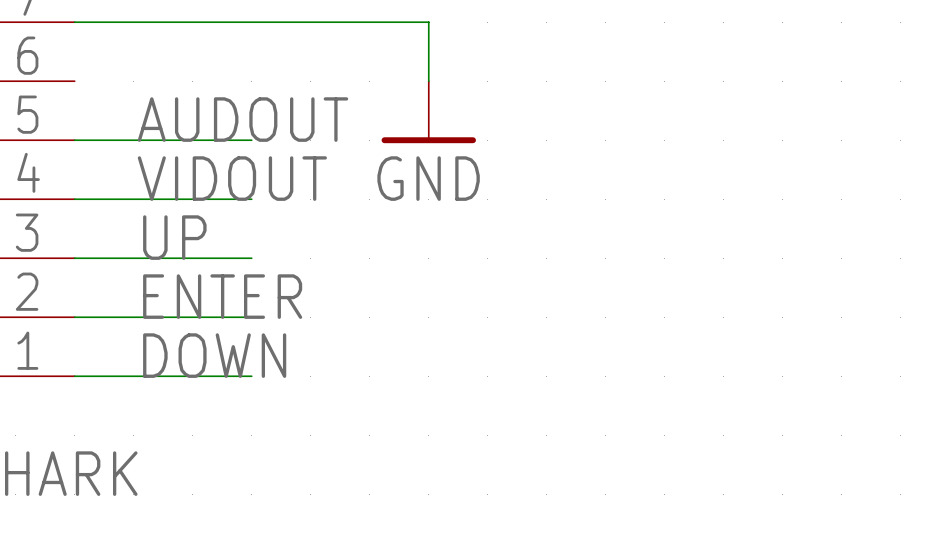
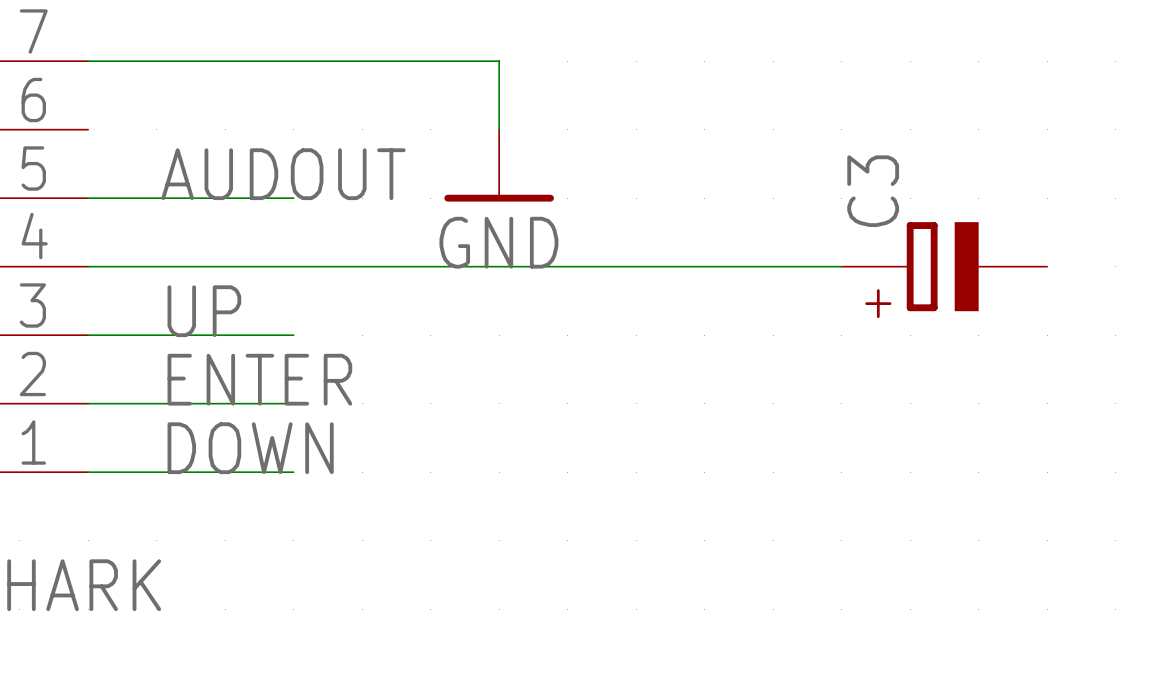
label: VIDOUT (232, 178) -> none
wire: none -> (293, 266) (841, 266)
C3: none -> (944, 266)

